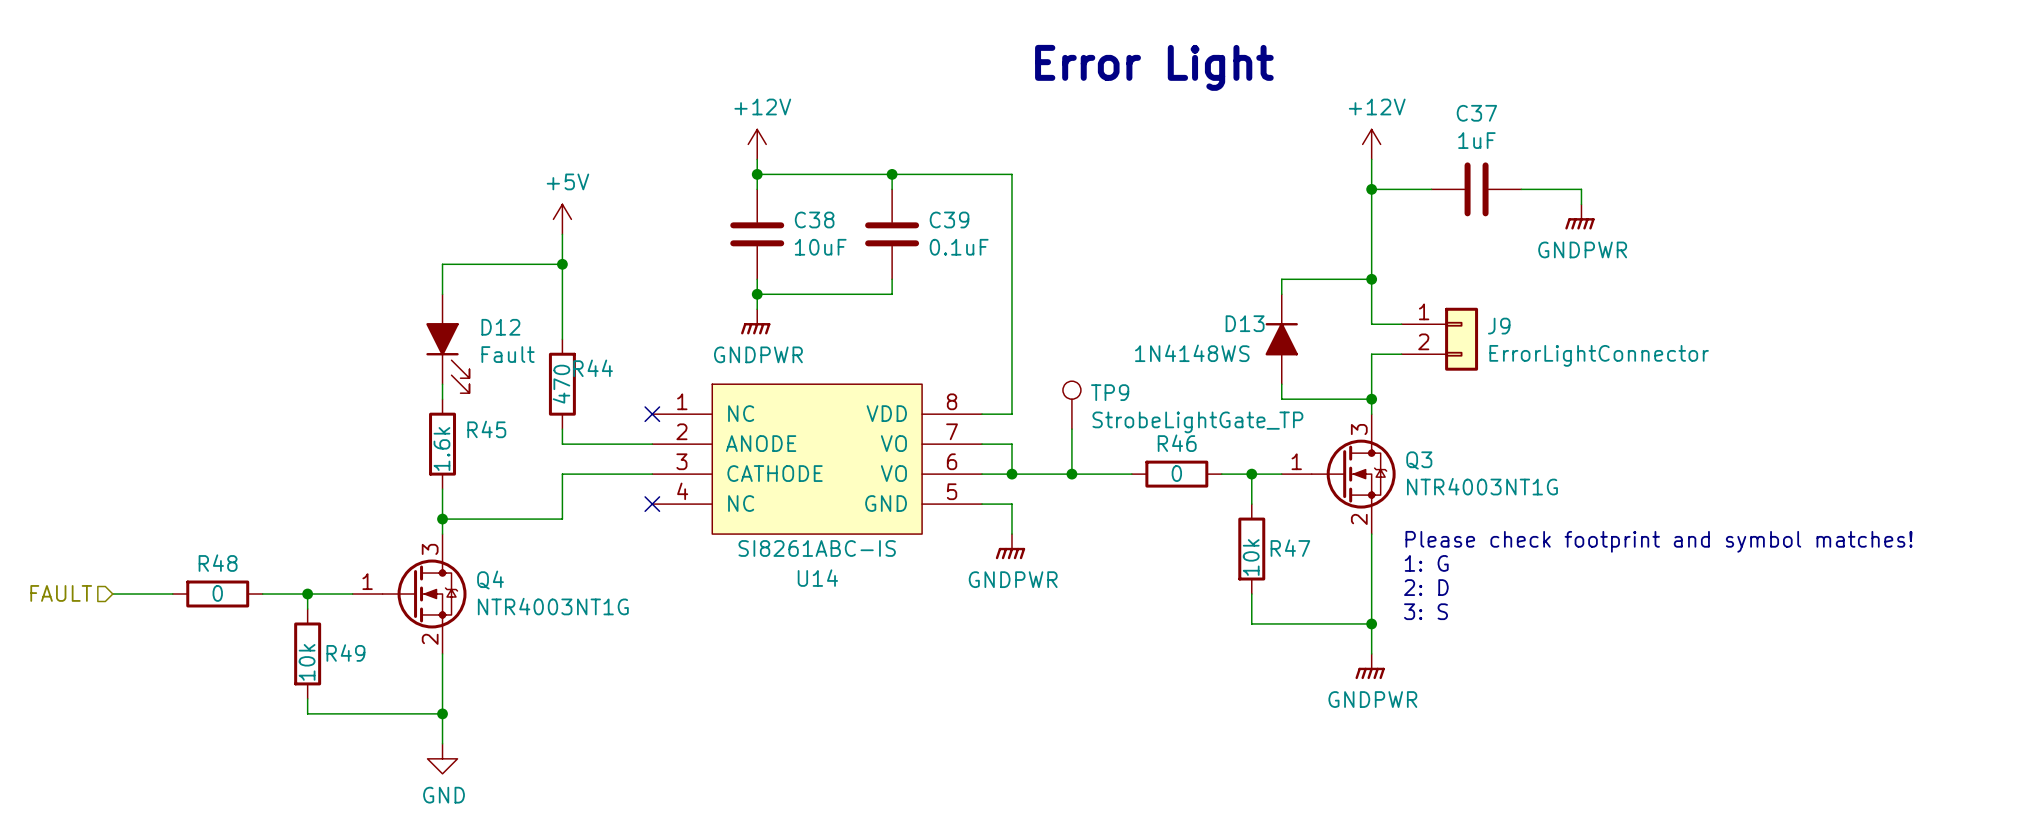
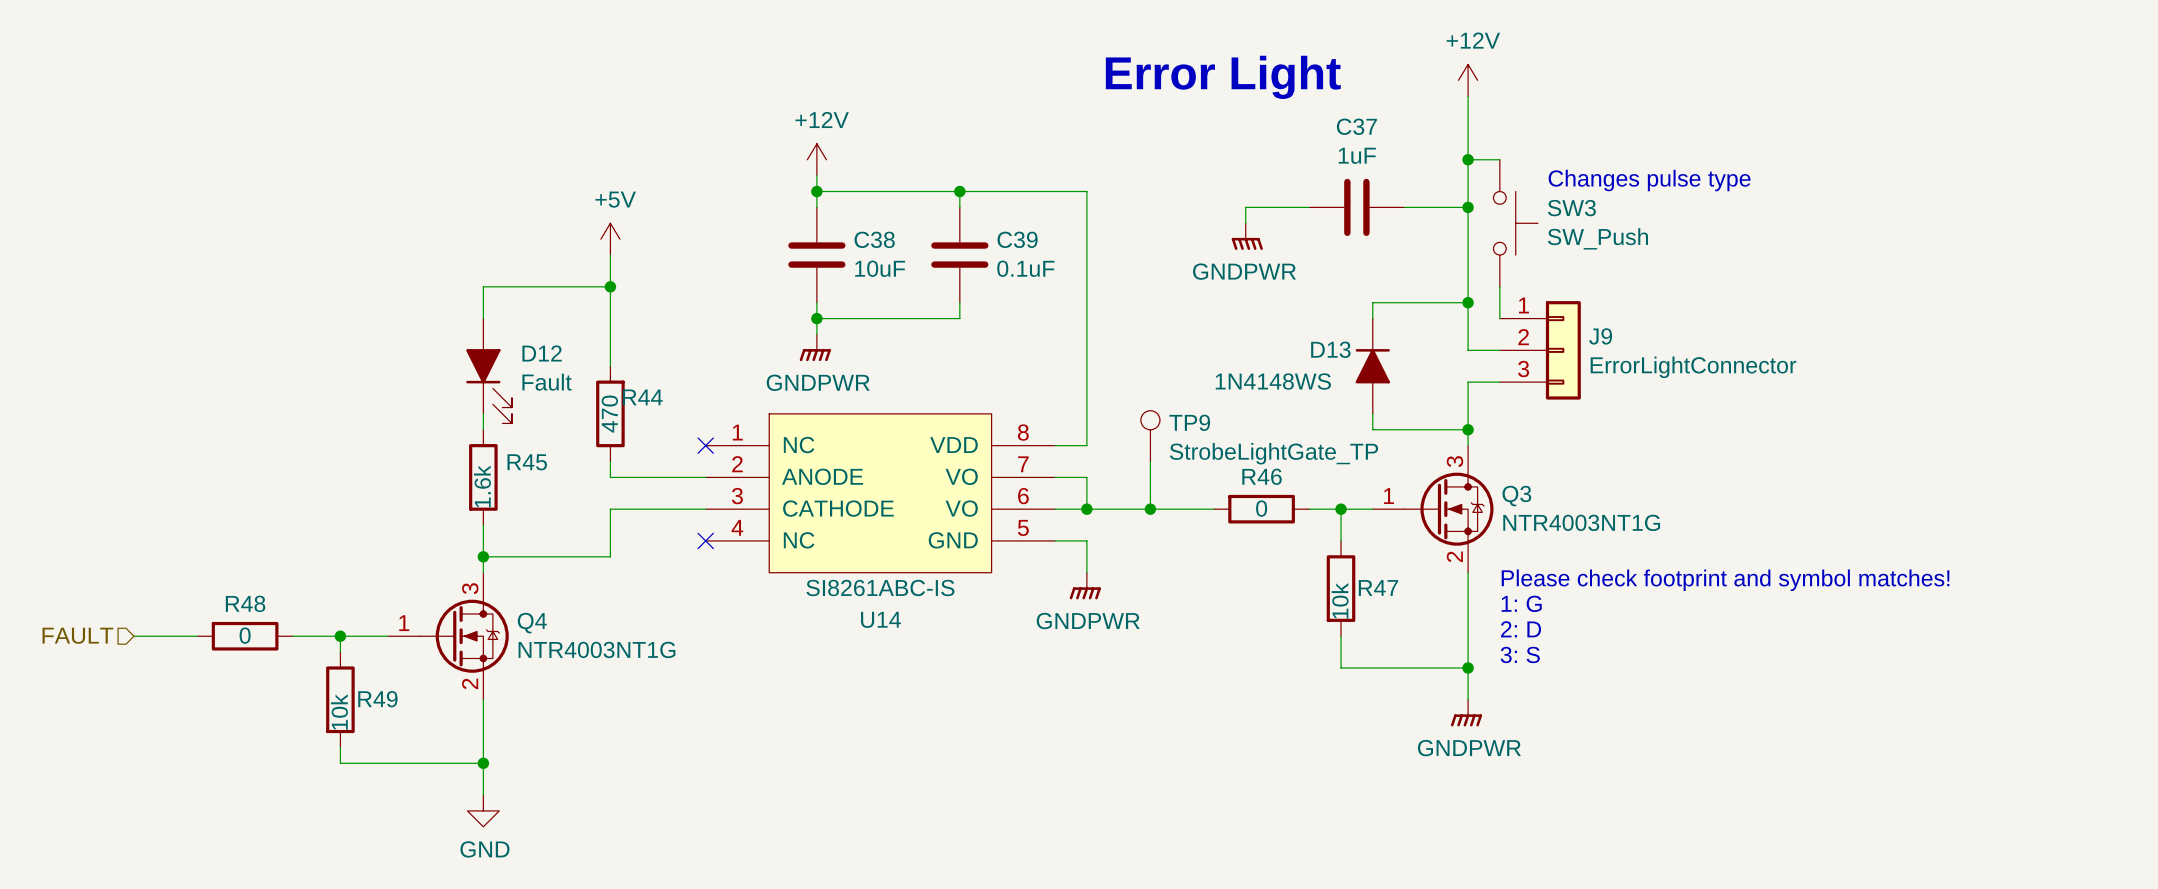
wire: none -> (1468, 96) (1468, 175)
wire: none -> (1468, 159) (1499, 159)
power symbol position: +12V (1371, 144) -> +12V (1468, 80)
junction: none -> (1468, 159)
text: none -> Changes pulse type (1649, 180)
wire: none -> (1309, 207) (1245, 207) (1245, 223)
wire: (1371, 189) (1431, 189) -> (1468, 207) (1404, 207)
C37 position: (1476, 189) -> (1356, 207)
wire: (1521, 189) (1581, 189) (1581, 204) -> none
SW3: none -> SW_Push (1515, 223)
power symbol: none -> GNDPWR (1247, 236)
power symbol: GNDPWR (1579, 216) -> none
wire: none -> (1499, 286) (1499, 318)
J9 symbol: [1401, 307, 1479, 371] -> [1499, 301, 1581, 400]

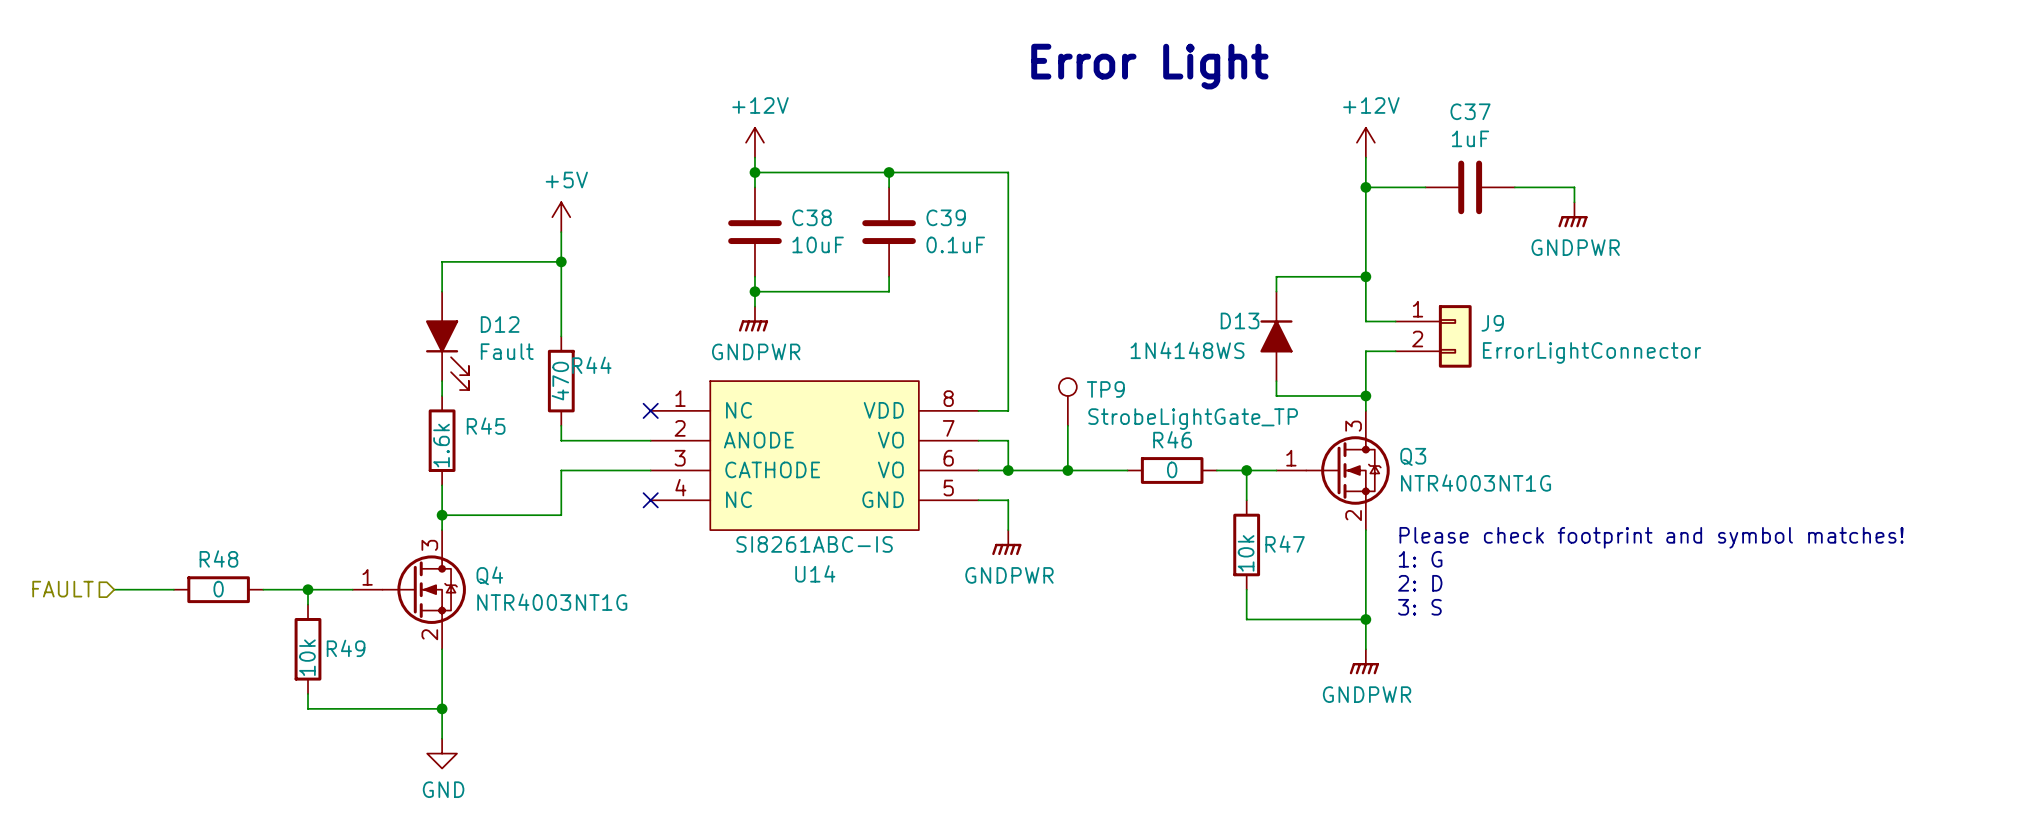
power symbol position: +12V (1468, 80) -> +12V (1365, 142)
wire: (1468, 96) (1468, 175) -> none
wire: (1468, 159) (1499, 159) -> none
junction: (1468, 159) -> none
text: Changes pulse type (1649, 180) -> none
wire: (1309, 207) (1245, 207) (1245, 223) -> none
C37 position: (1356, 207) -> (1470, 187)
wire: (1404, 207) (1468, 207) -> (1425, 187) (1365, 187)
wire: none -> (1514, 187) (1574, 187) (1574, 202)
SW3: SW_Push (1515, 223) -> none
power symbol: GNDPWR (1247, 236) -> none
power symbol: none -> GNDPWR (1572, 214)
wire: (1499, 286) (1499, 318) -> none
J9 symbol: [1499, 301, 1581, 400] -> [1395, 305, 1472, 368]

